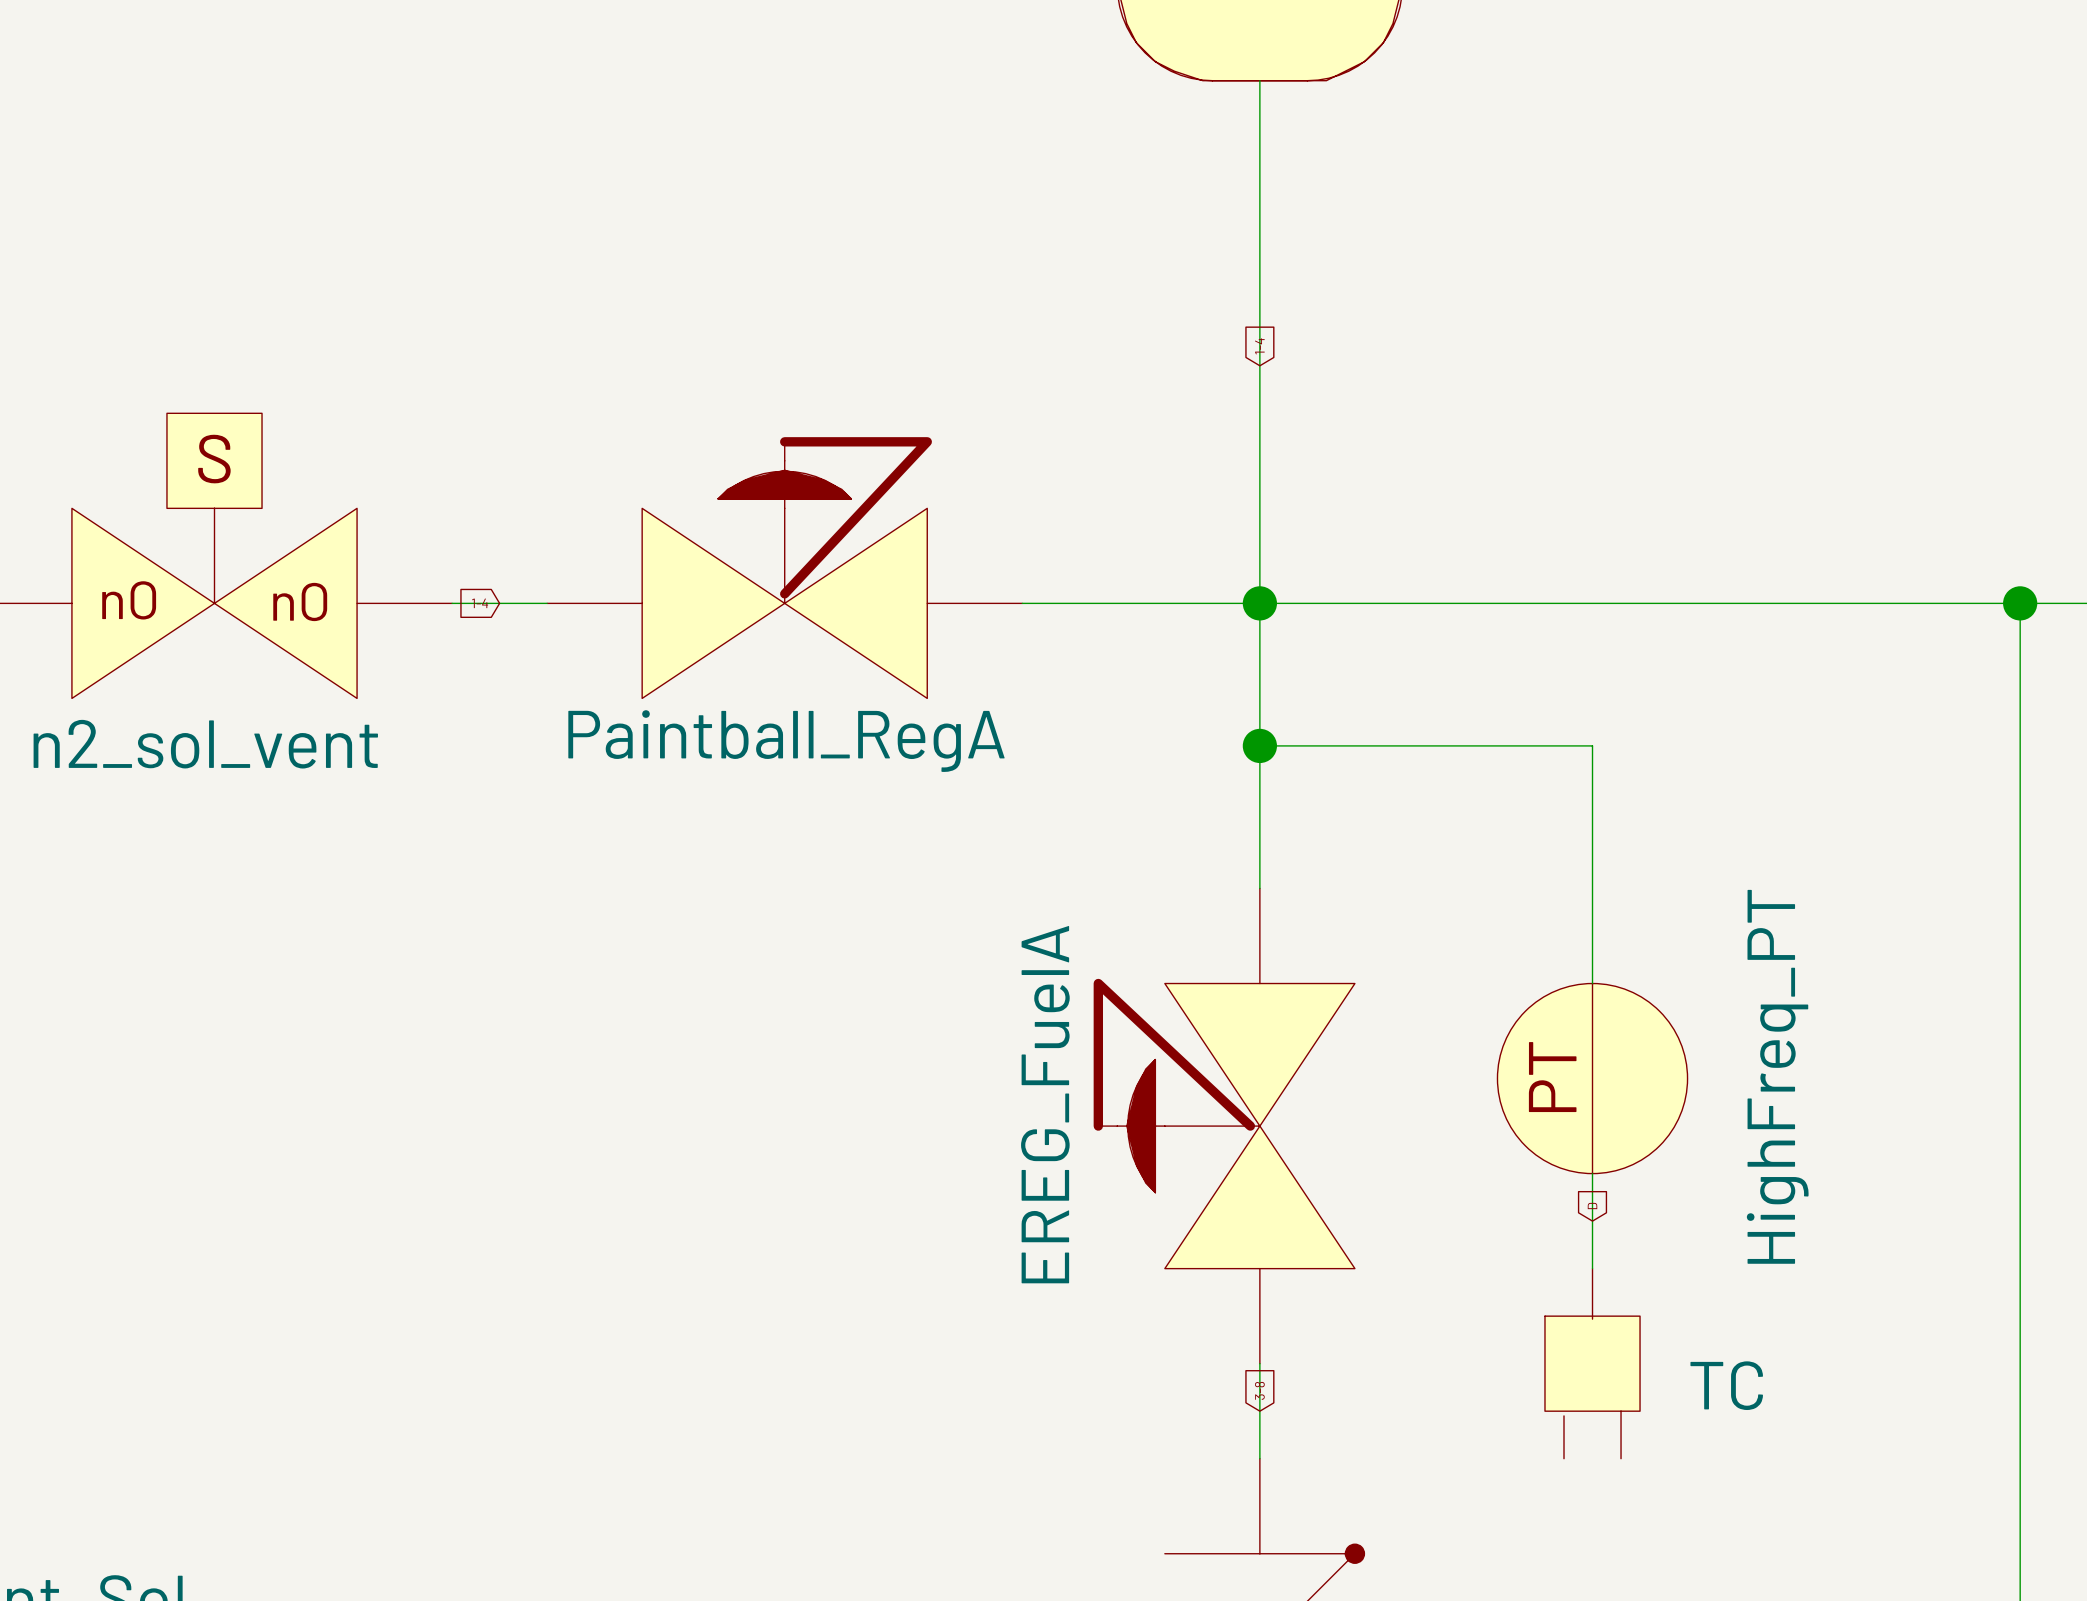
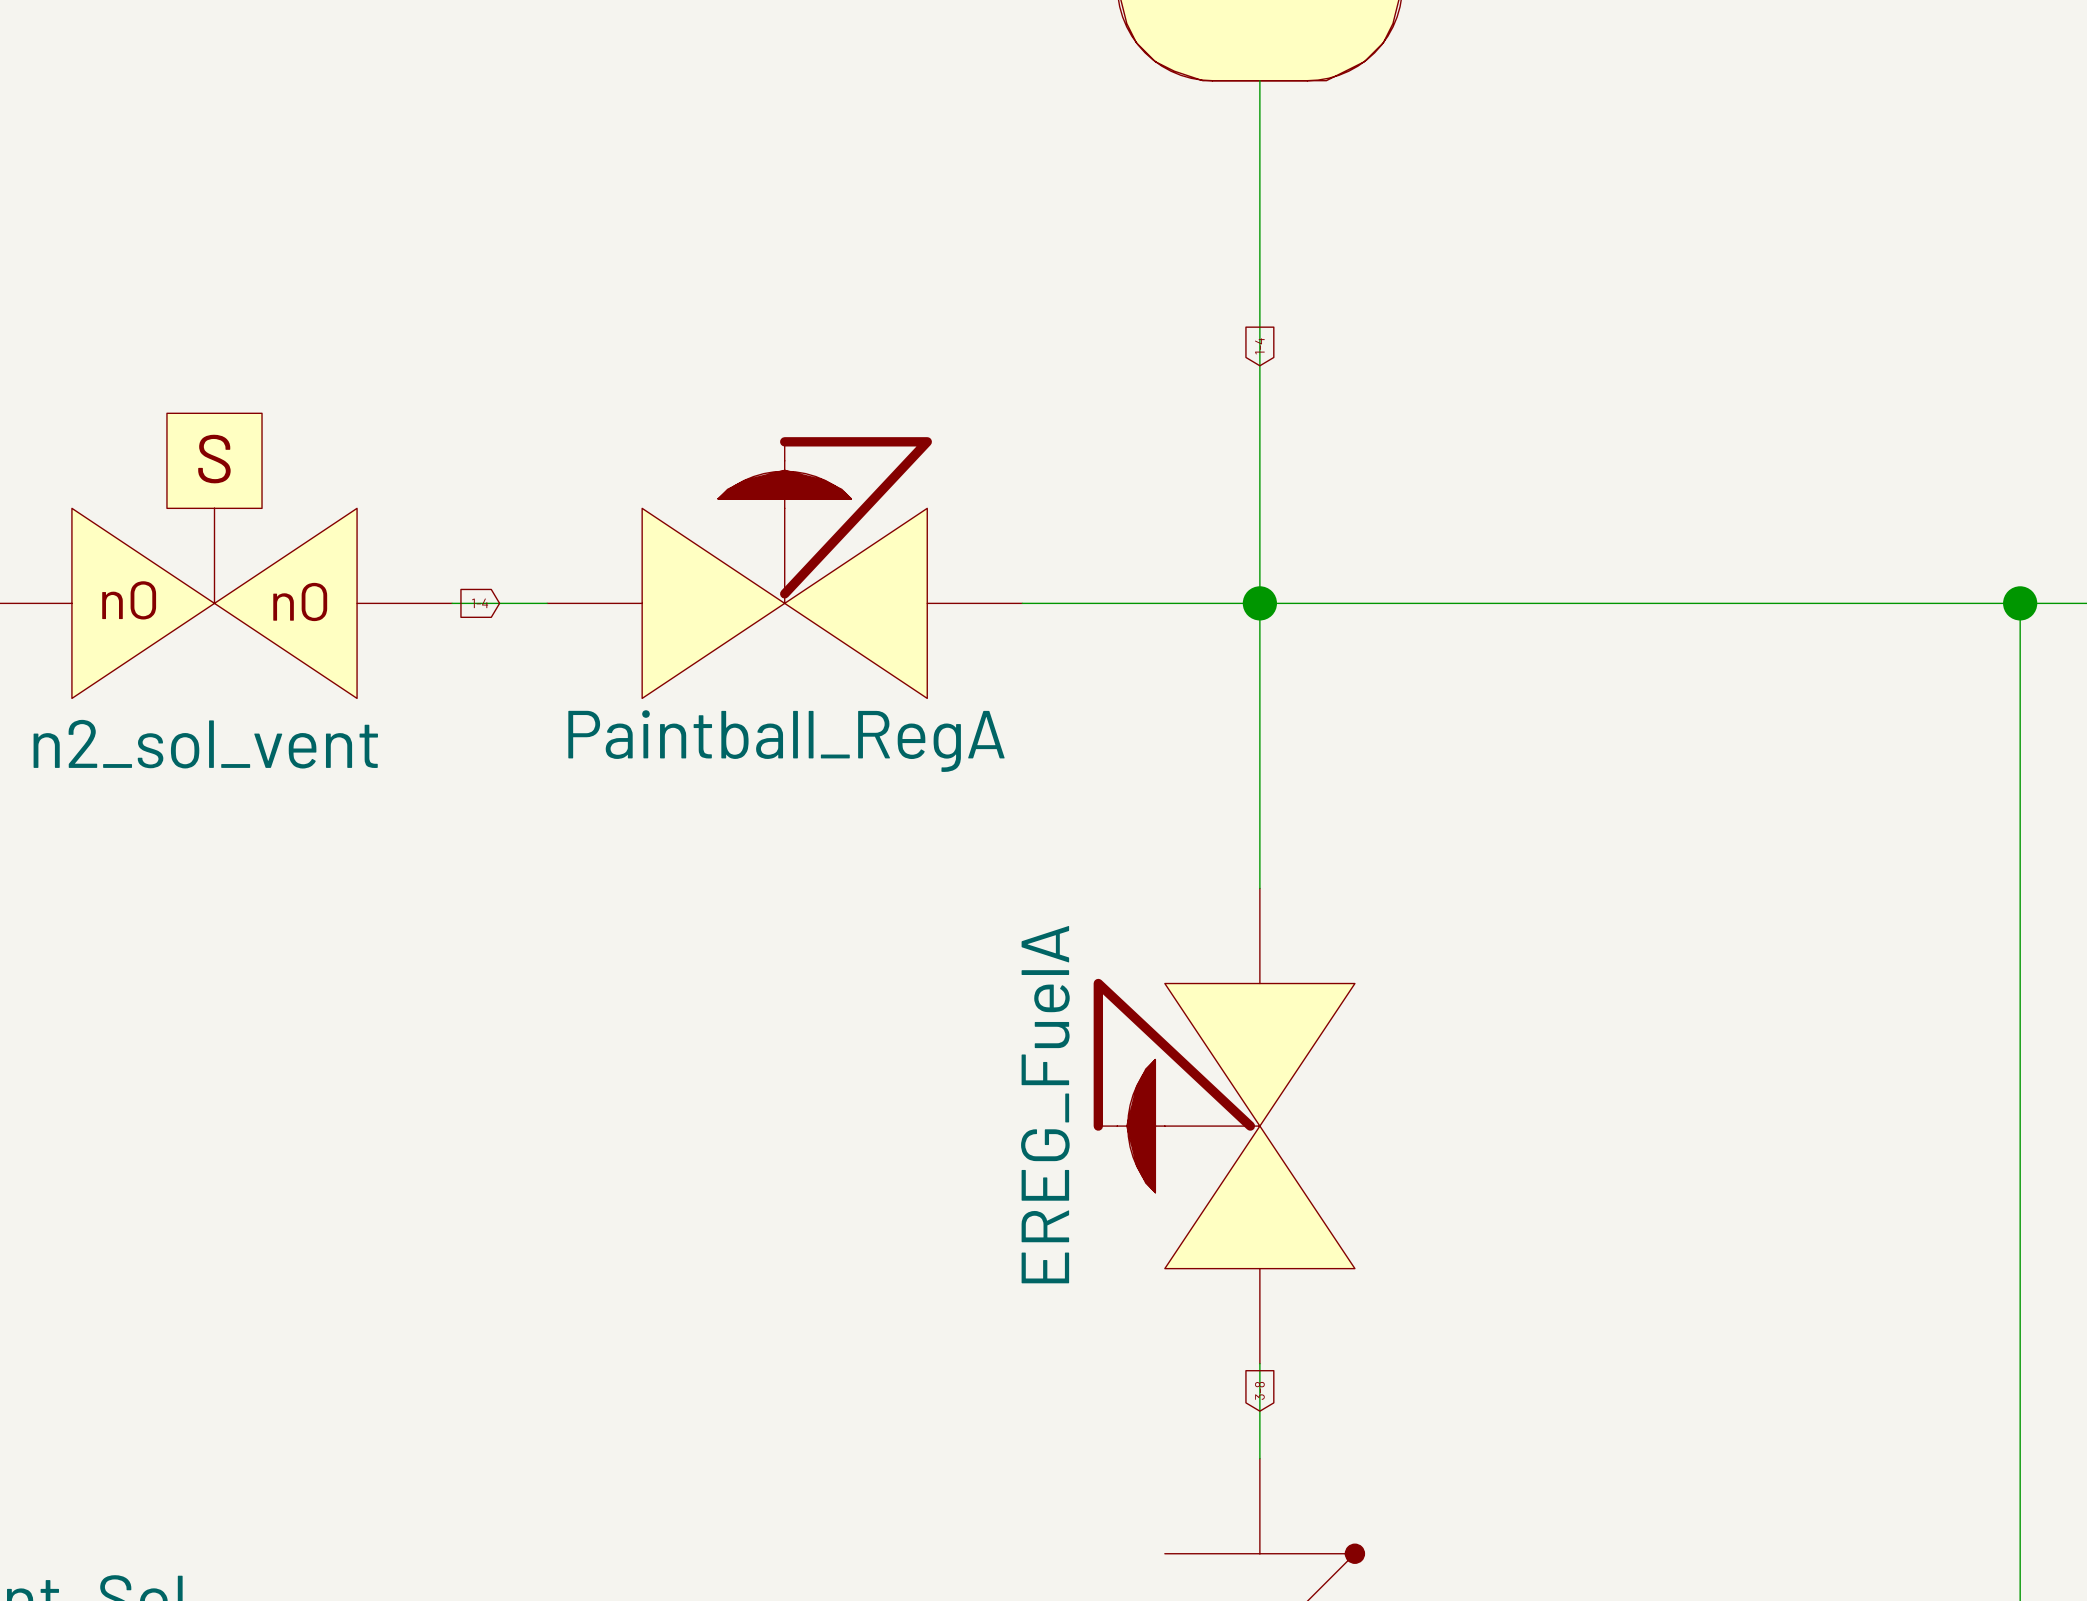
wire: (1259, 745) (1592, 745) (1592, 983) -> none
junction: (1259, 745) -> none
HighFreq_PT: (1592, 1078) -> none
wire: (1592, 1173) (1592, 1268) -> none
global label: D (1592, 1206) -> none
TC: (1592, 1363) -> none

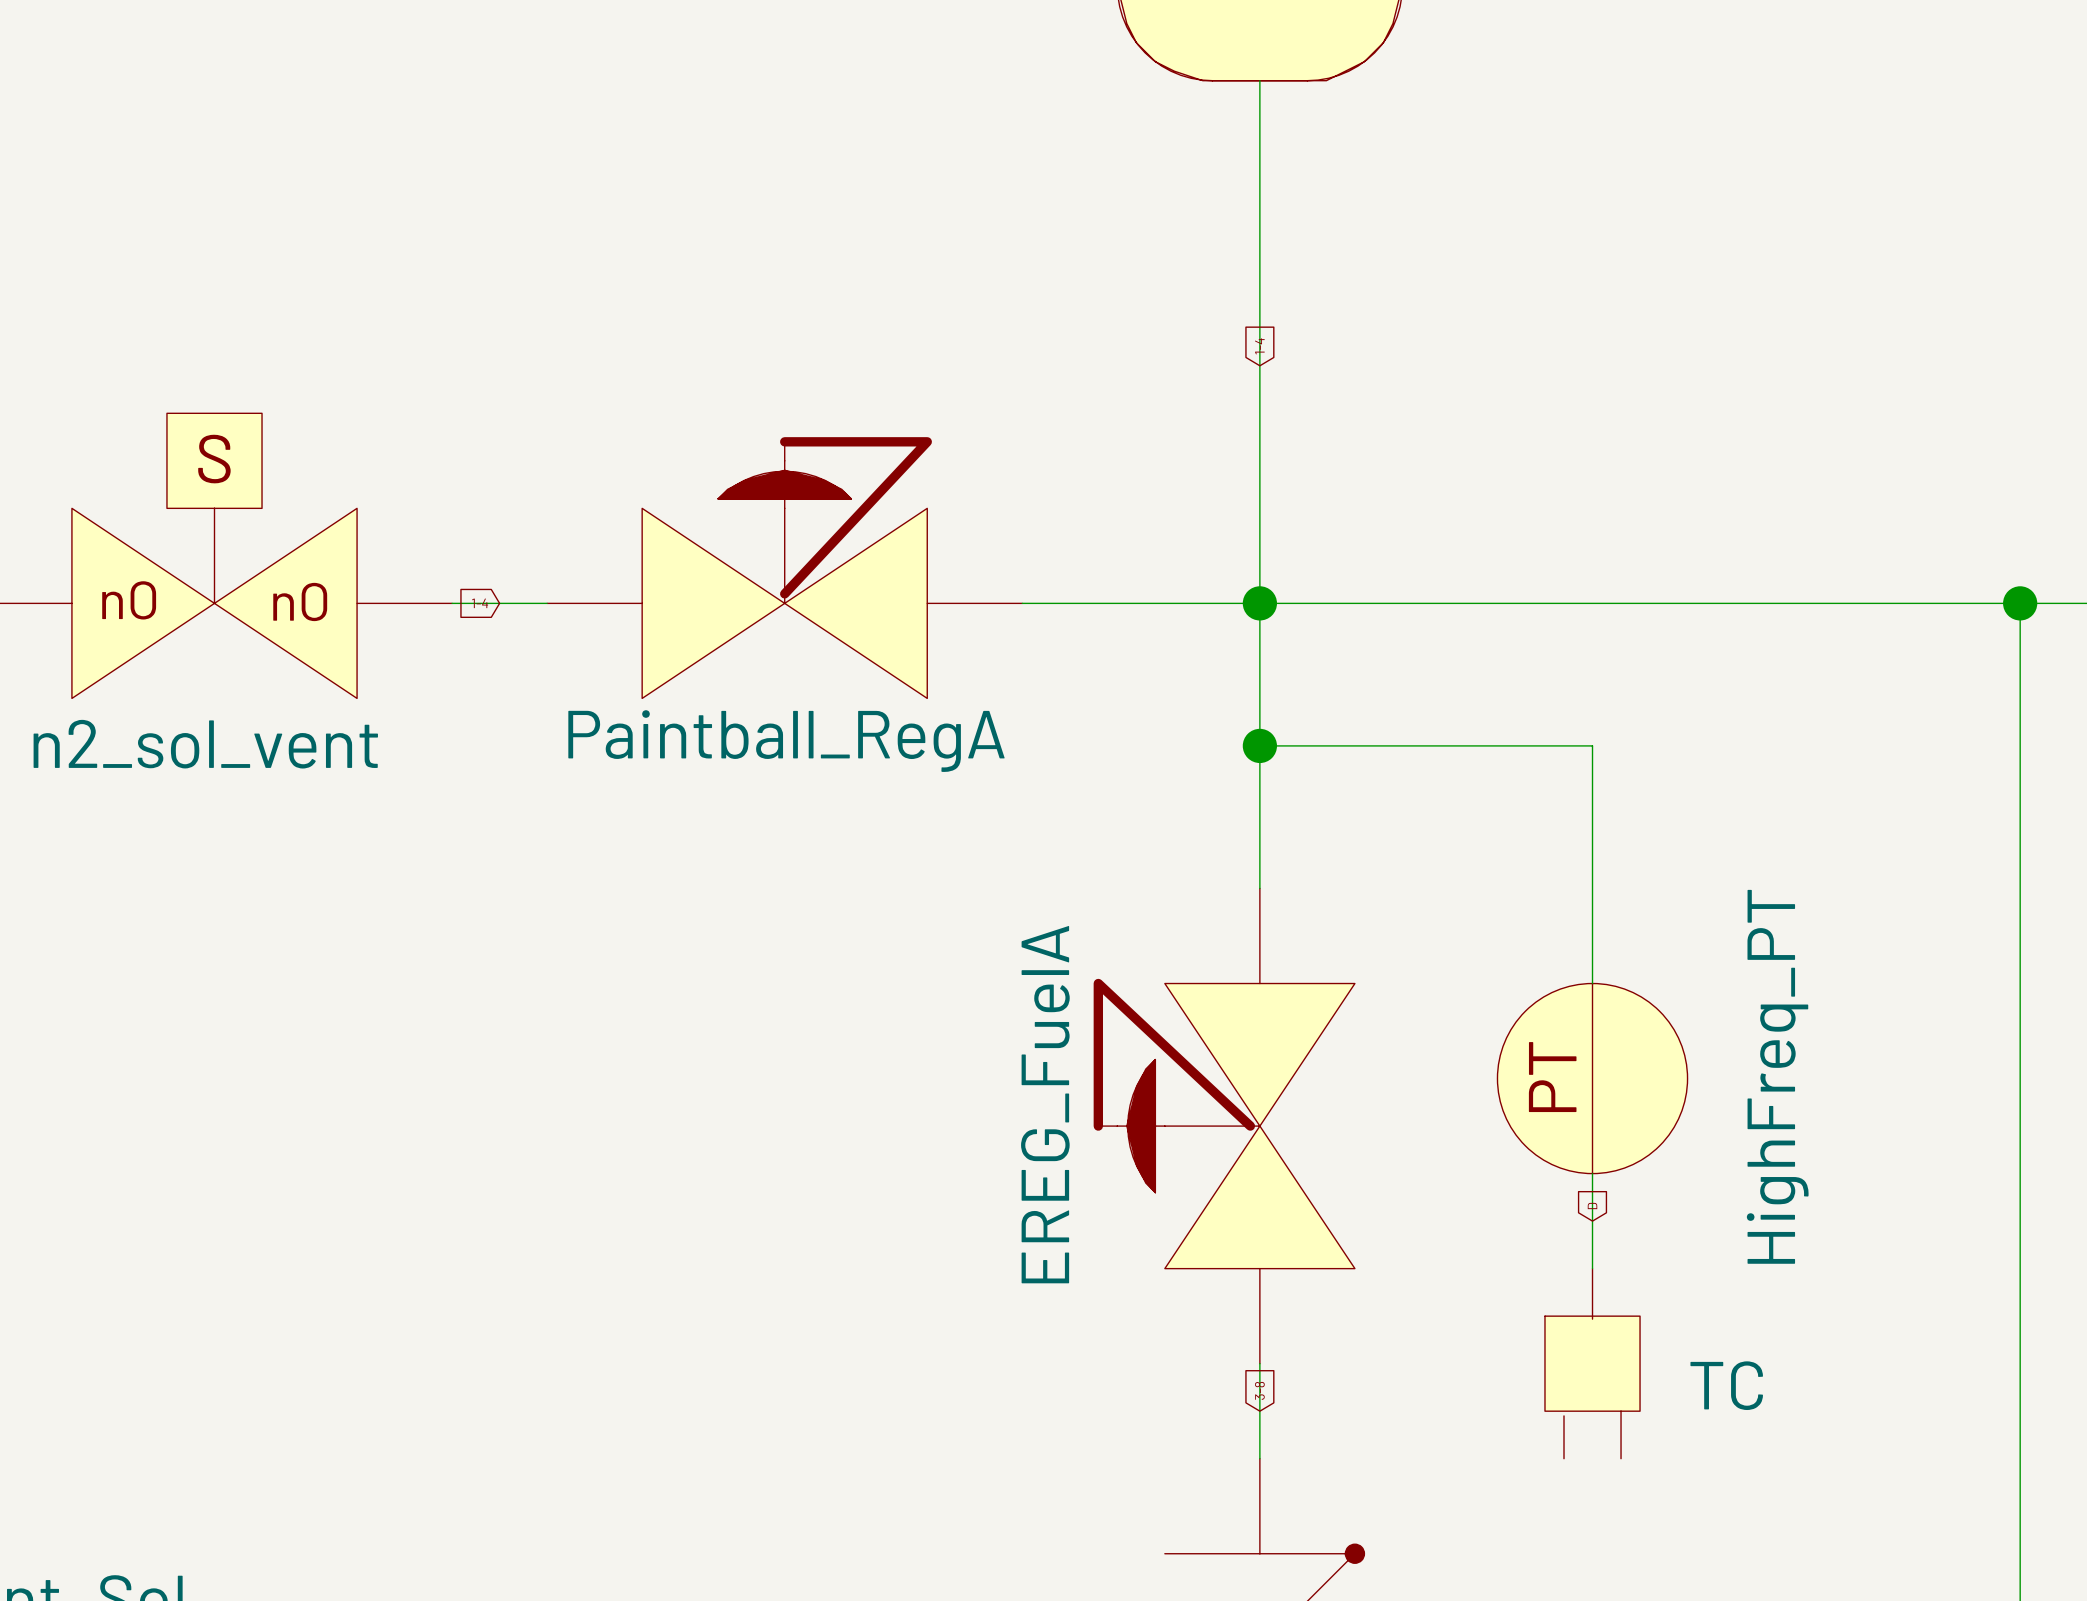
wire: none -> (1259, 745) (1592, 745) (1592, 983)
junction: none -> (1259, 745)
HighFreq_PT: none -> (1592, 1078)
wire: none -> (1592, 1173) (1592, 1268)
global label: none -> D (1592, 1206)
TC: none -> (1592, 1363)

